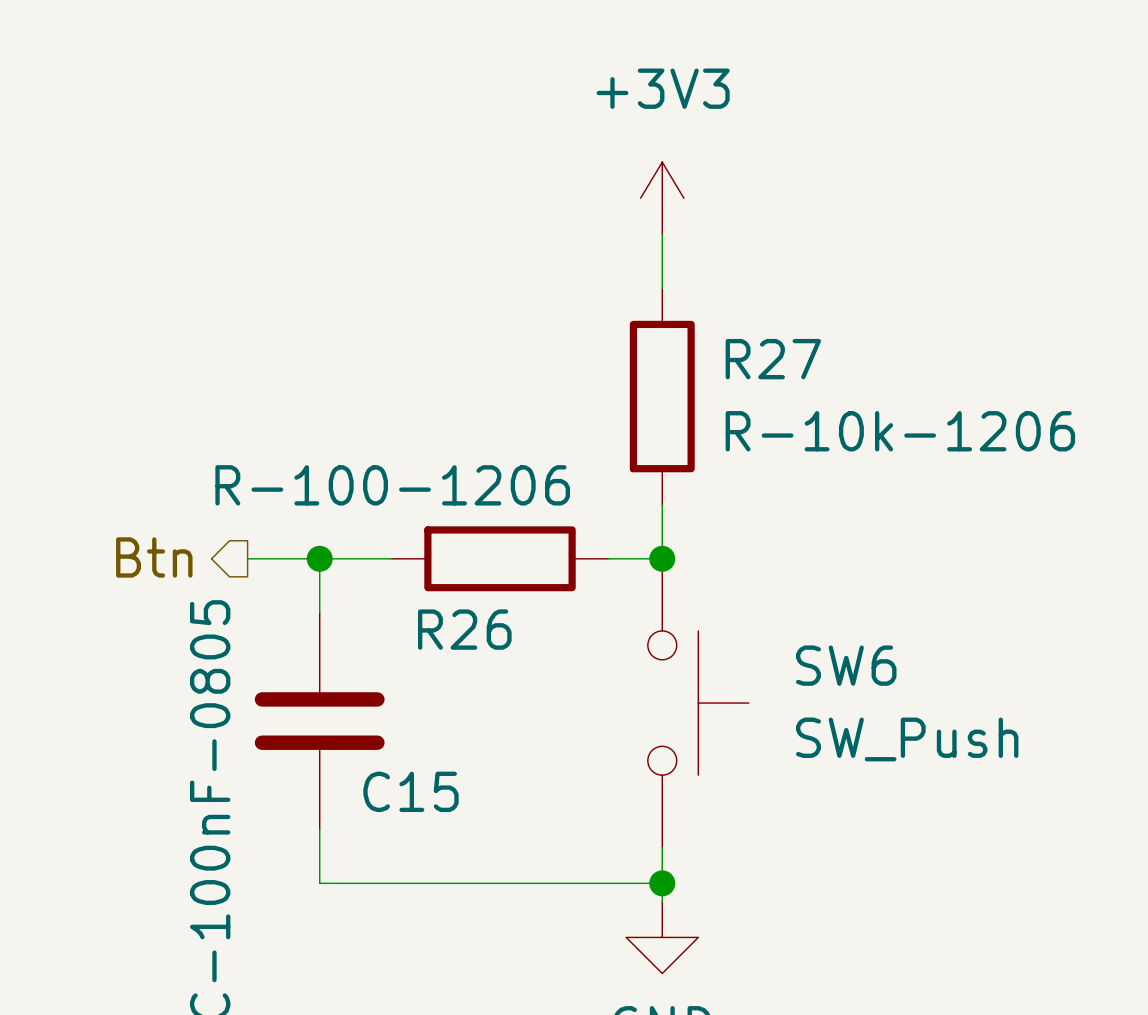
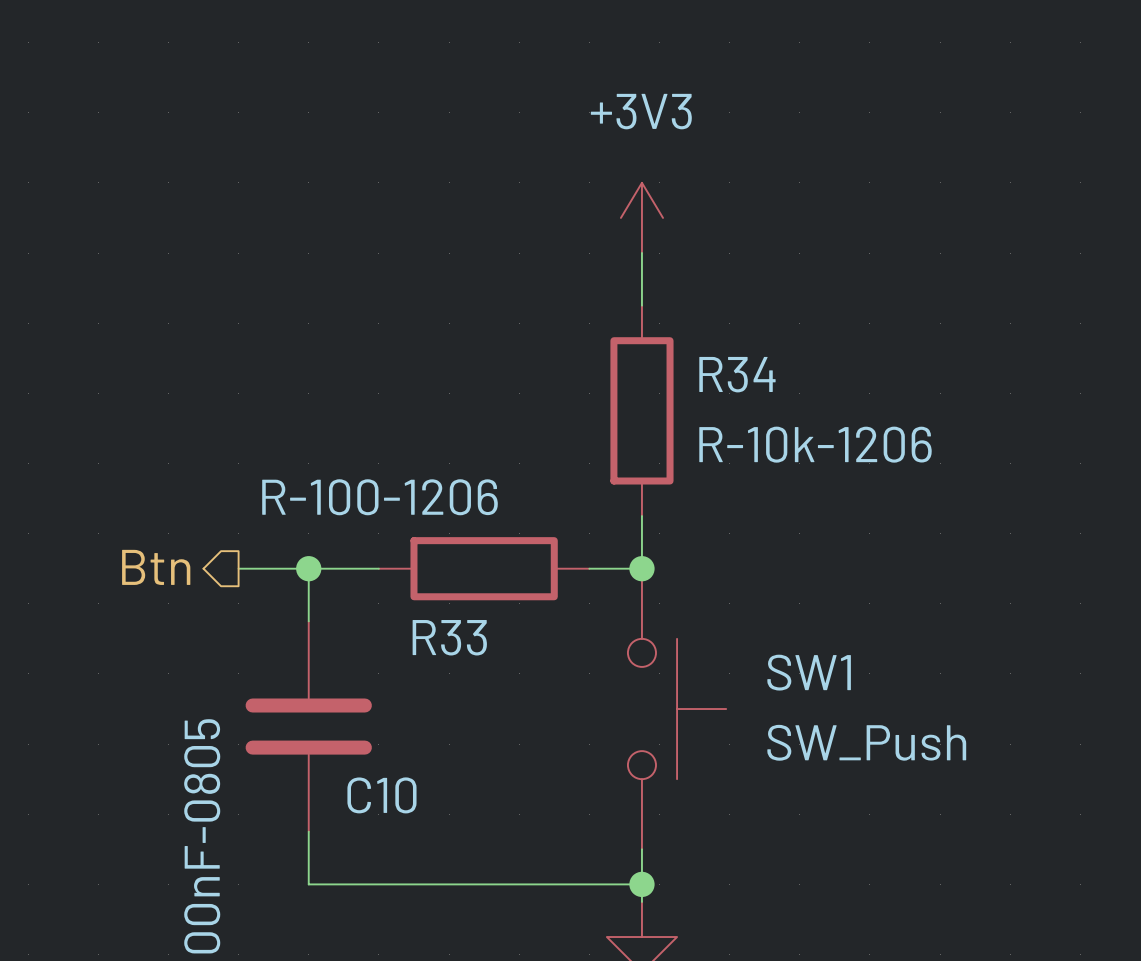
R27 name: R27 (773, 359) -> R34 (737, 374)
R26 name: R26 (464, 629) -> R33 (449, 637)
SW6 name: SW6 (846, 665) -> SW1 (809, 672)
C15 name: C15 (410, 791) -> C10 (381, 795)

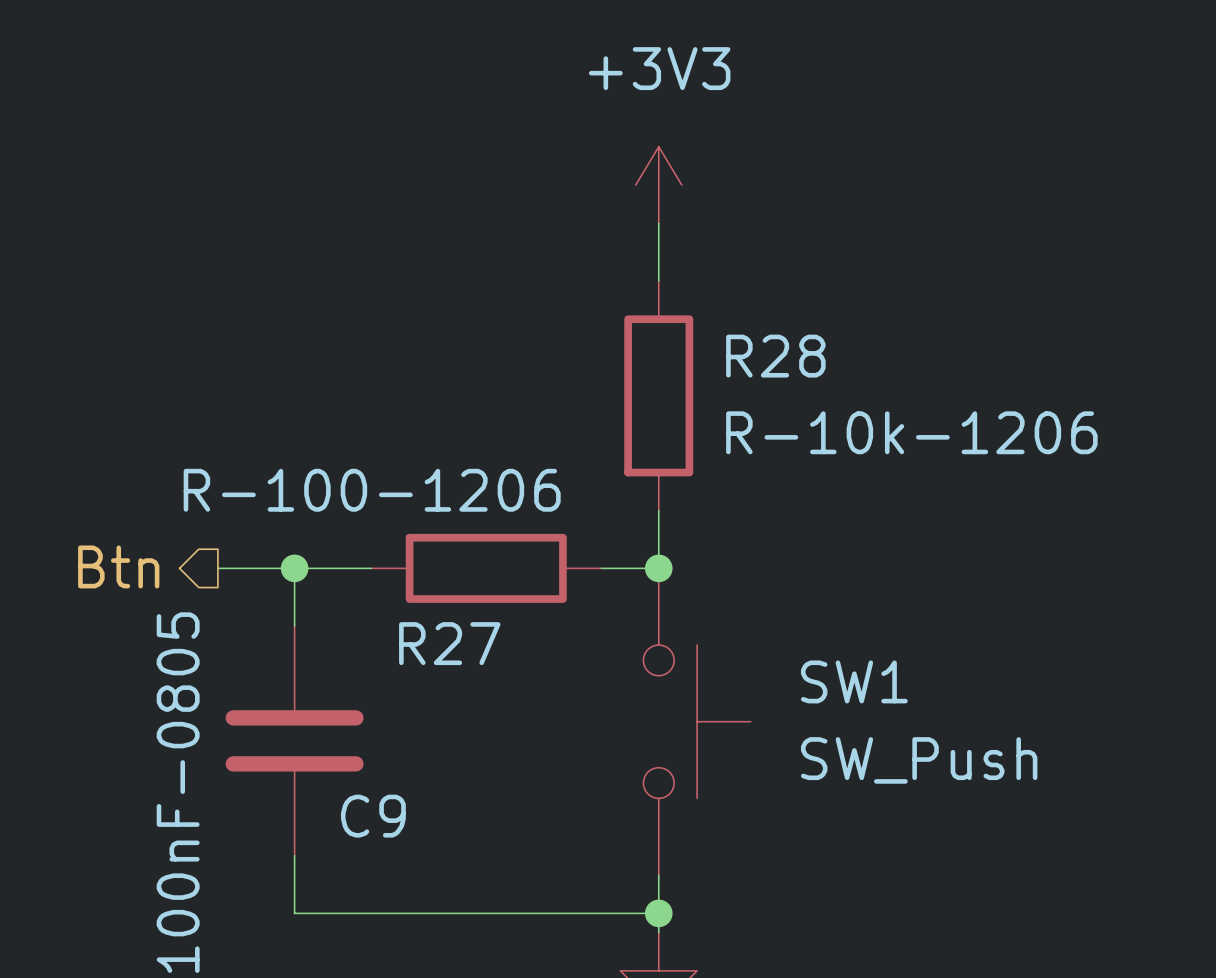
R34 name: R34 (737, 374) -> R28 (775, 356)
R33 name: R33 (449, 637) -> R27 (449, 643)
C10 name: C10 (381, 795) -> C9 (373, 816)

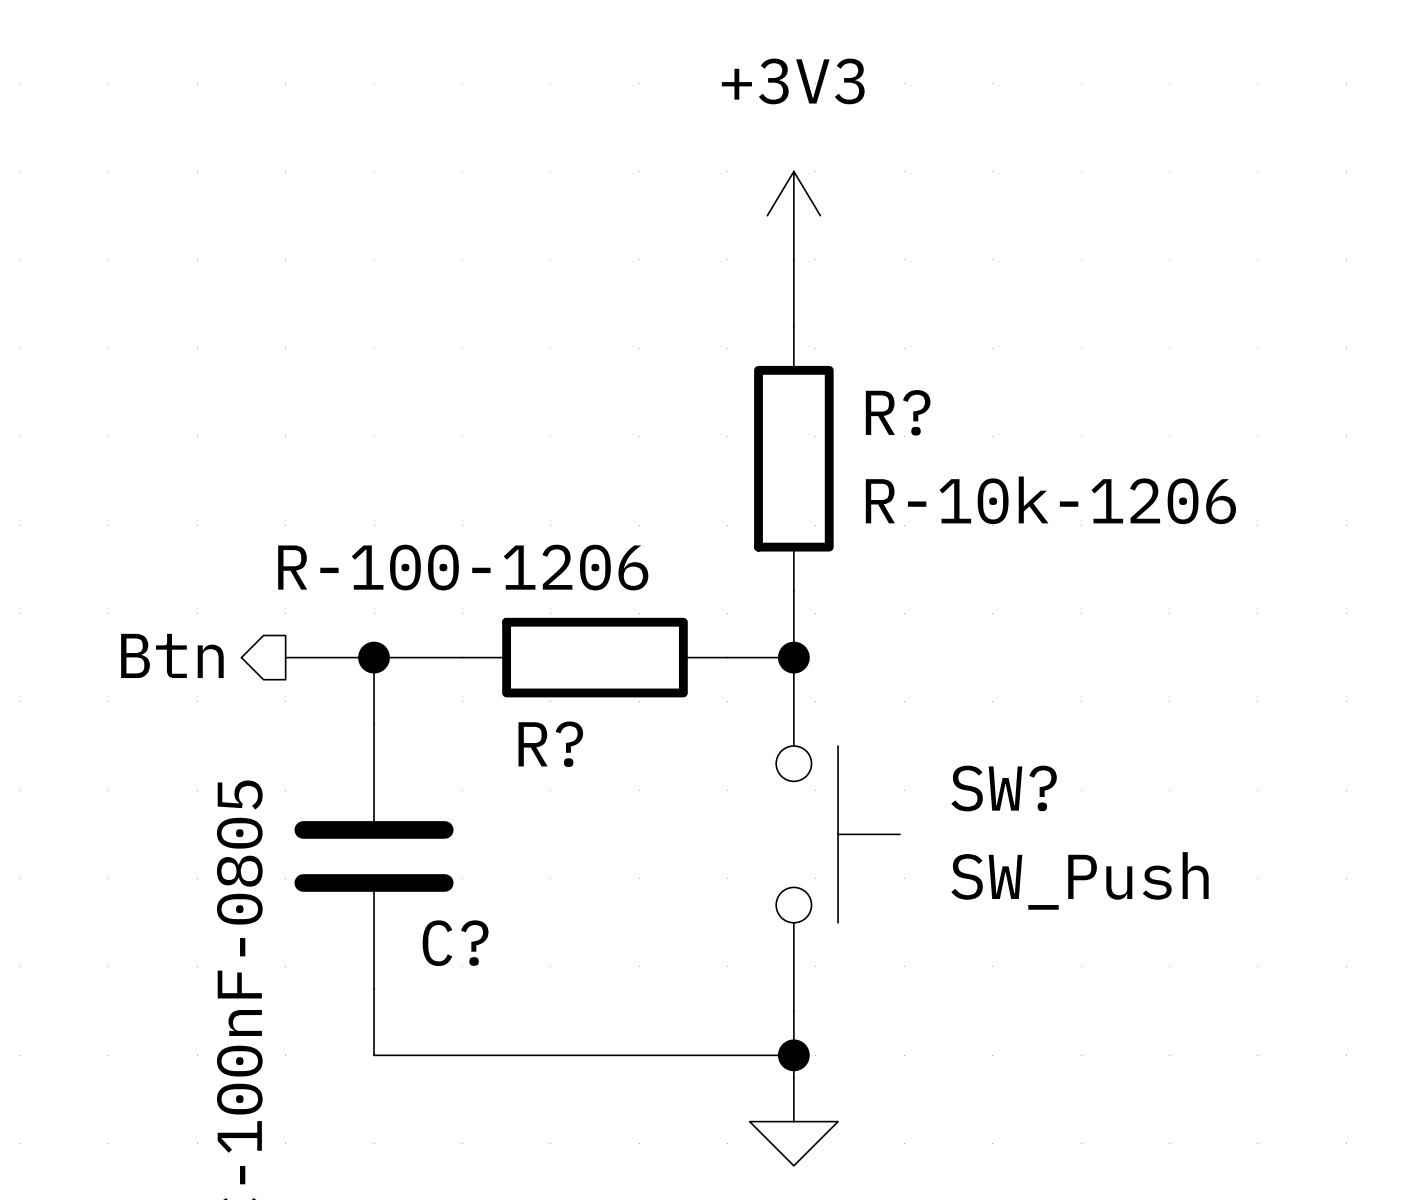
R28 name: R28 (775, 356) -> R? (898, 412)
R27 name: R27 (449, 643) -> R? (550, 744)
SW1 name: SW1 (854, 681) -> SW? (1004, 788)
C9 name: C9 (373, 816) -> C? (455, 943)

